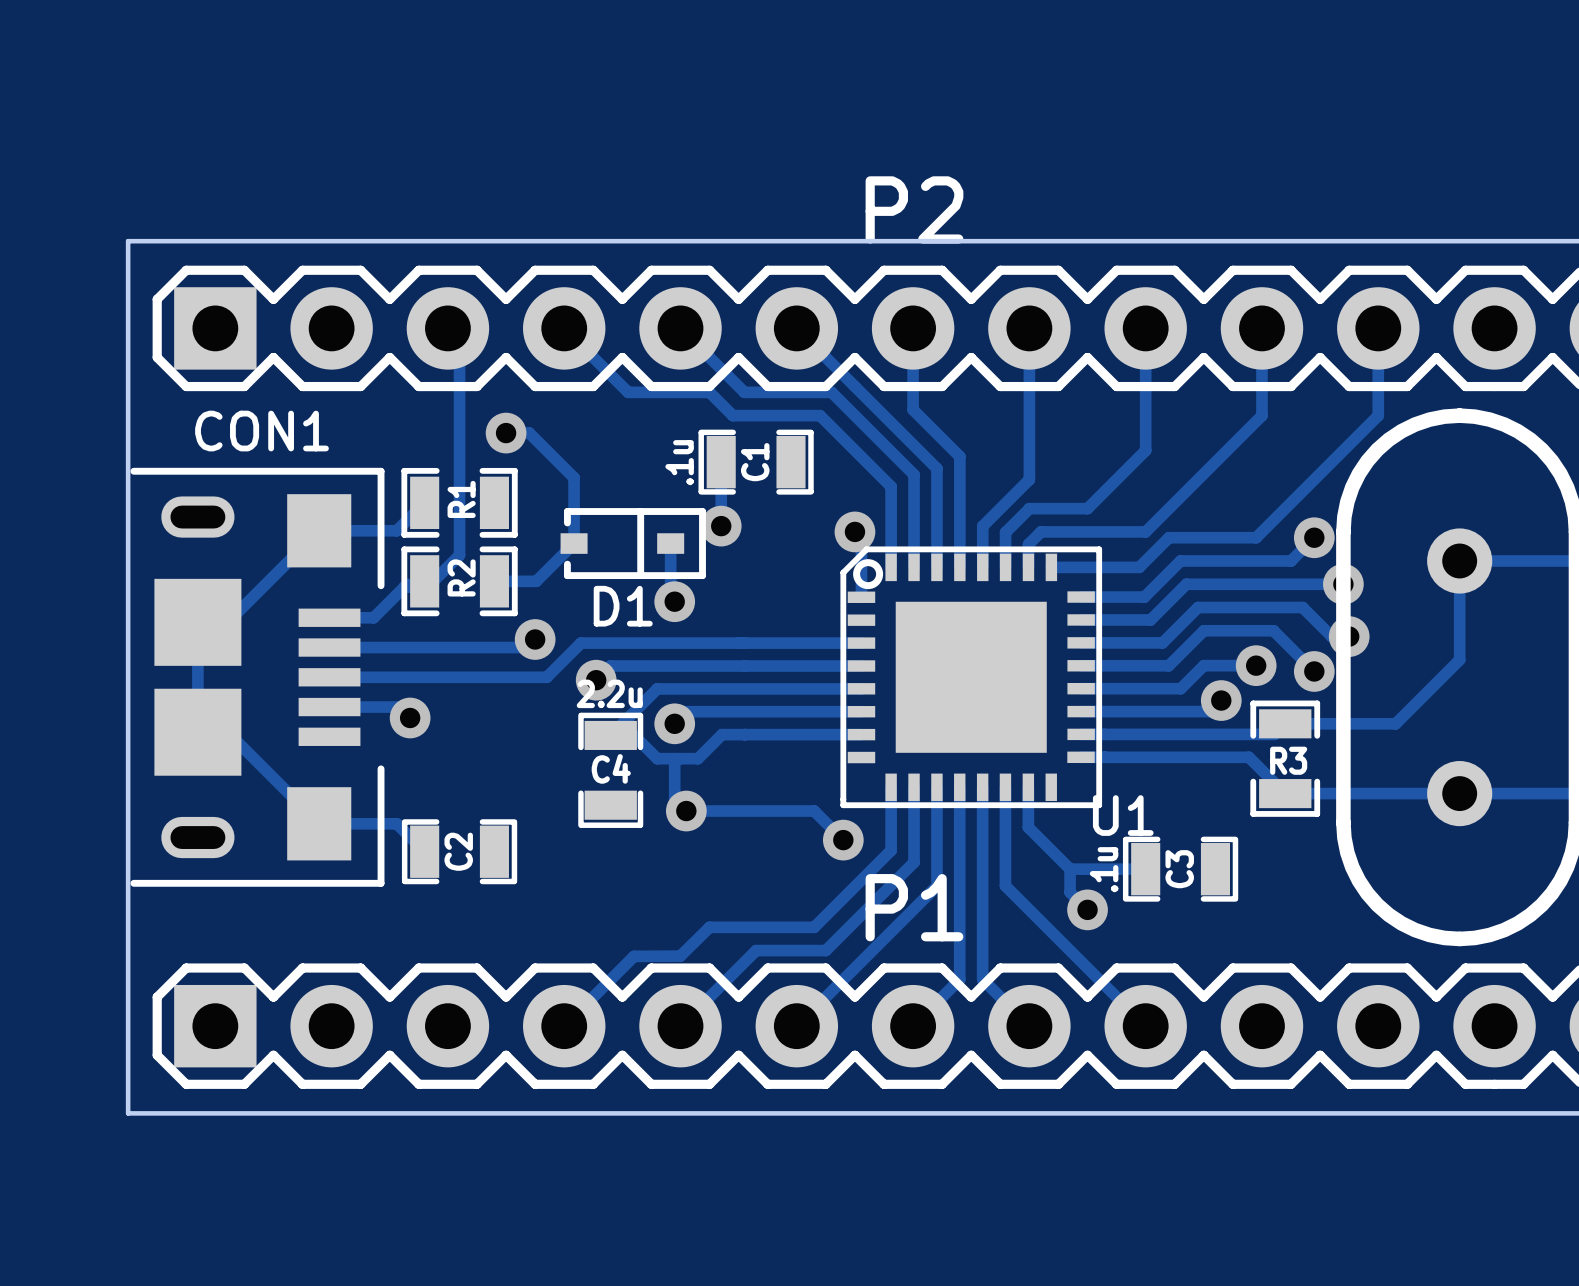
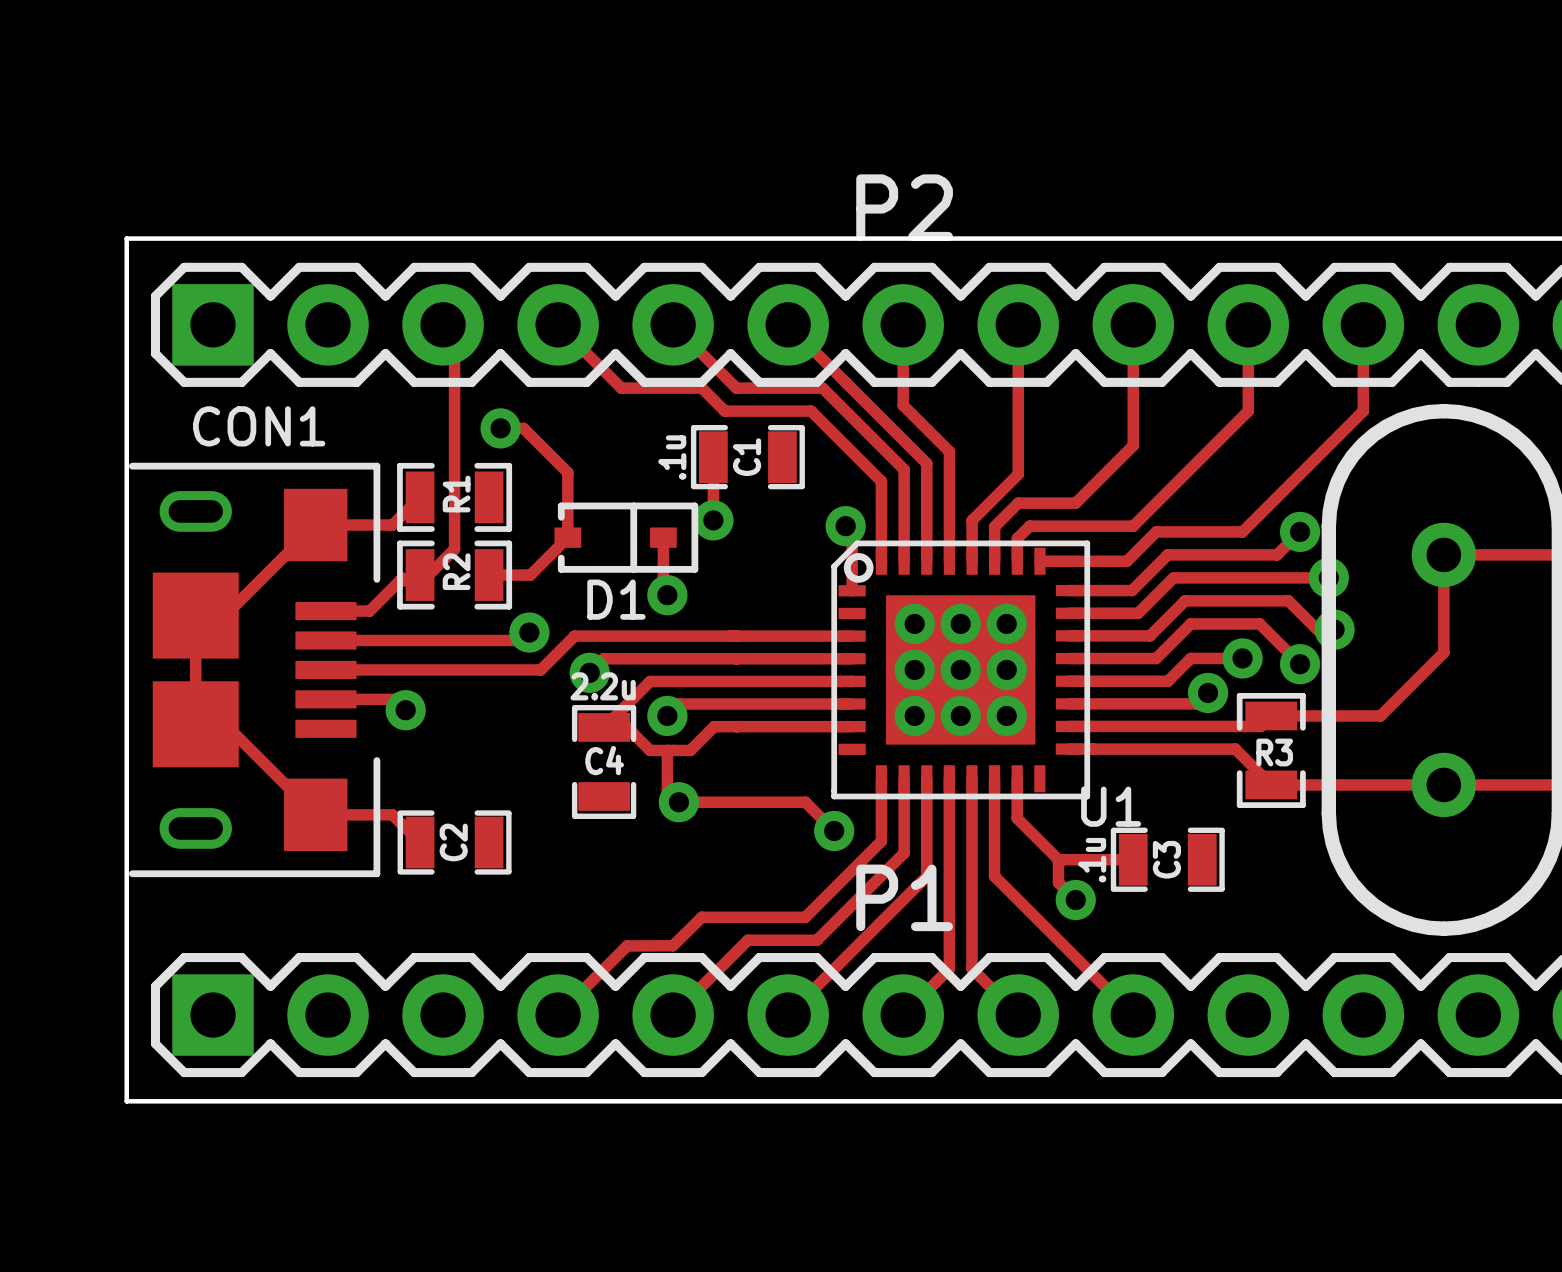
via: none -> (914, 623)
via: none -> (960, 623)
via: none -> (1006, 623)
via: none -> (914, 669)
via: none -> (960, 669)
via: none -> (1006, 669)
via: none -> (914, 715)
via: none -> (960, 715)
via: none -> (1006, 715)

